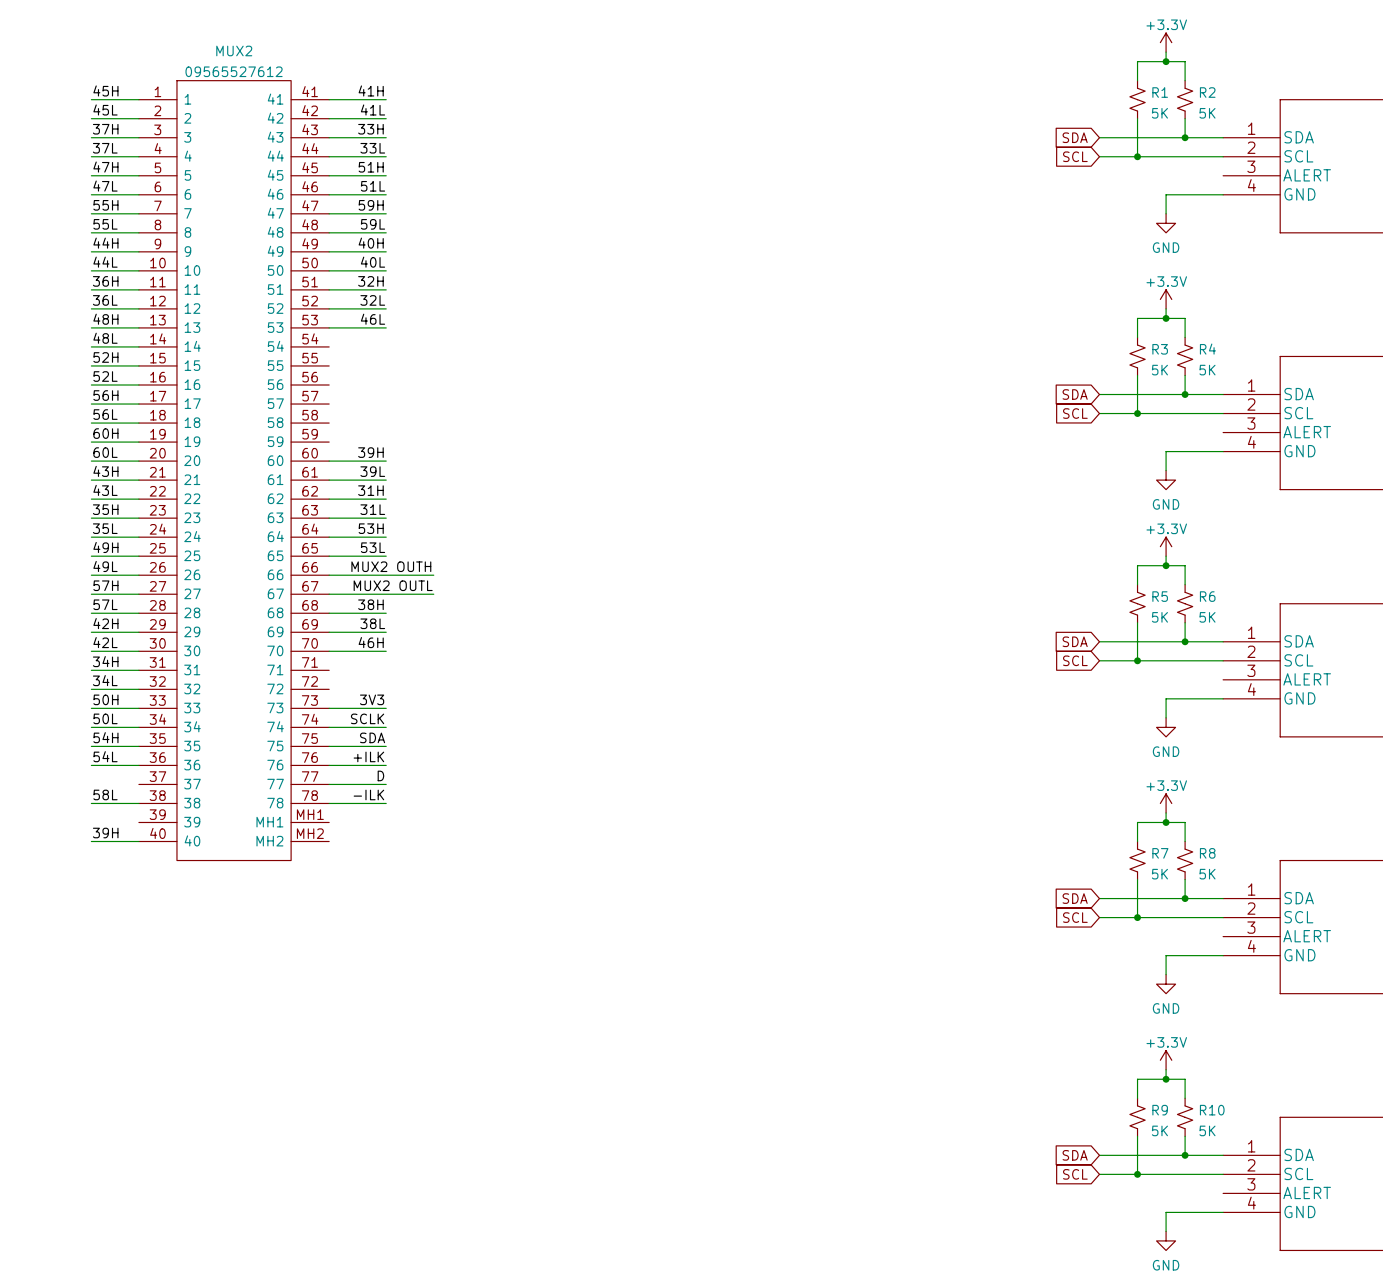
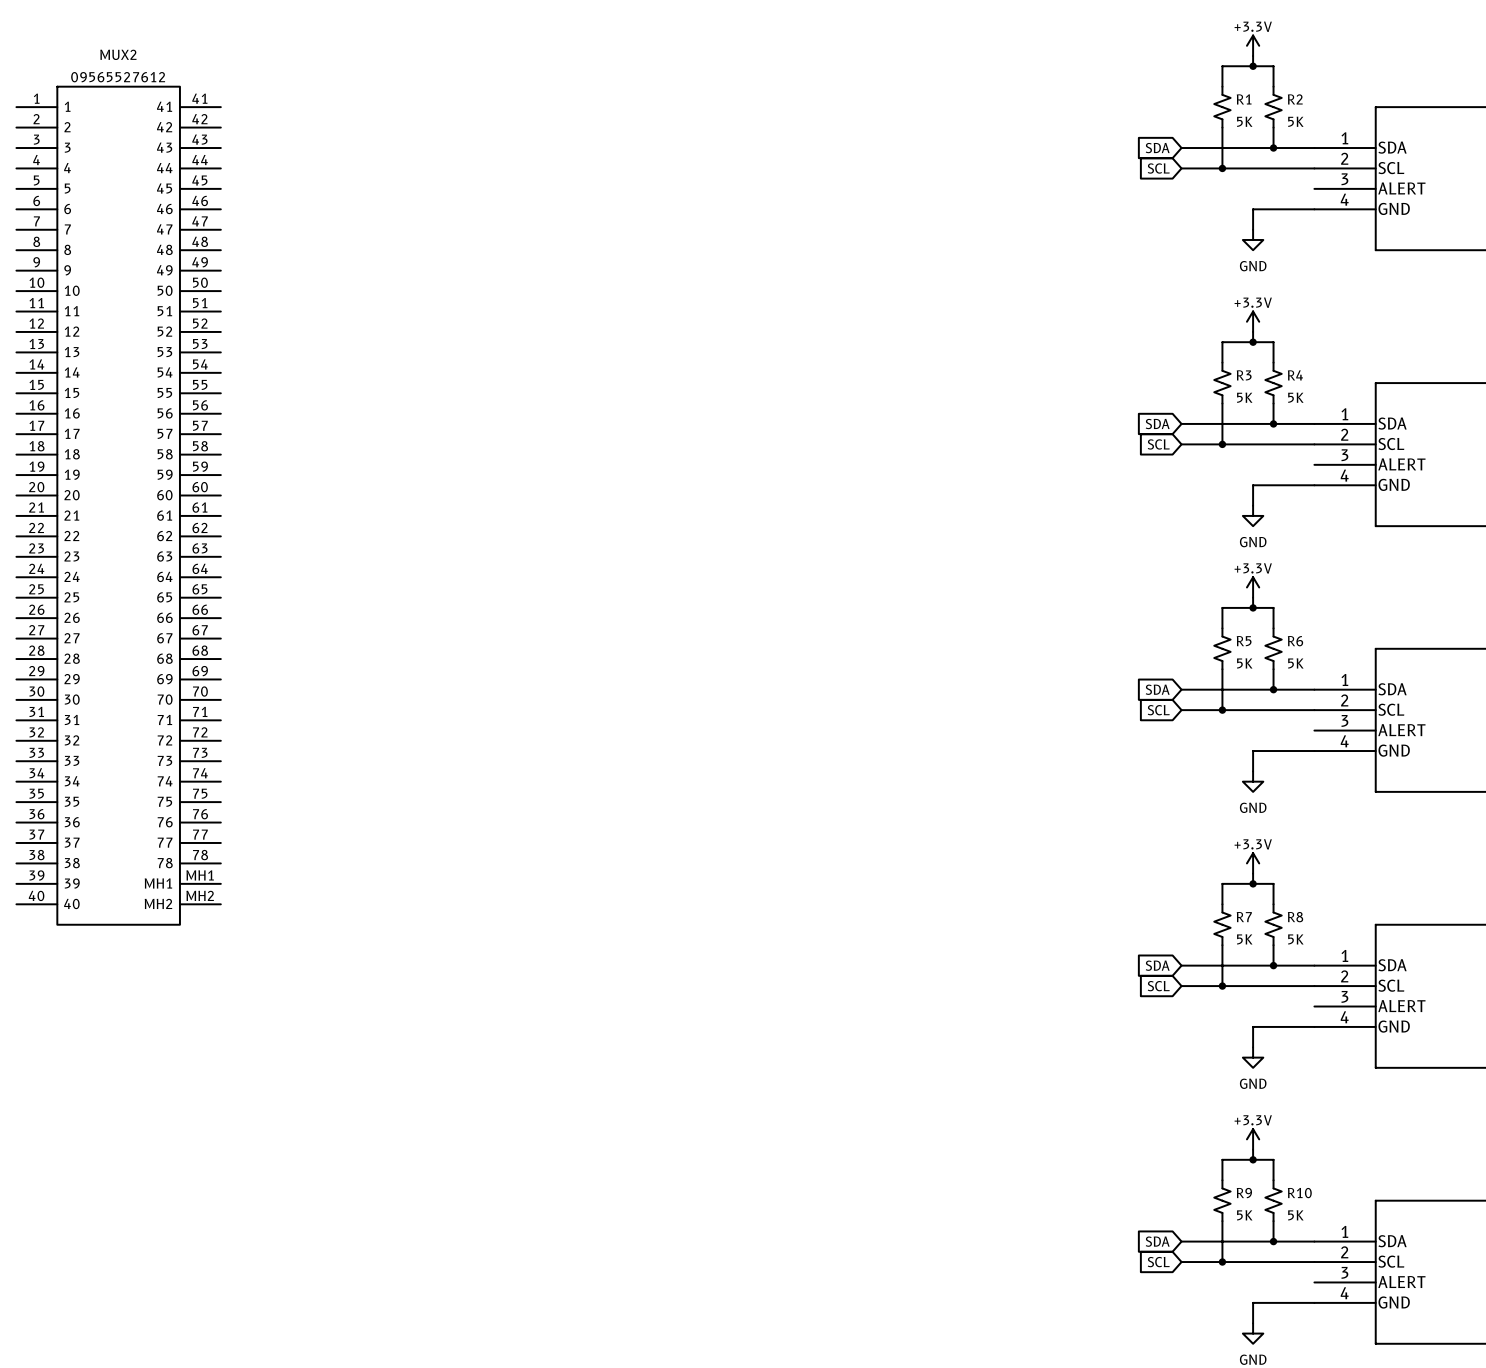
label: 45H (105, 90) -> none
label: 41H (371, 90) -> none
wire: (91, 99) (138, 99) -> none
wire: (329, 99) (386, 99) -> none
label: 45L (105, 109) -> none
label: 41L (373, 109) -> none
wire: (91, 118) (138, 118) -> none
wire: (329, 118) (386, 118) -> none
label: 37H (105, 129) -> none
label: 33H (370, 129) -> none
wire: (91, 137) (138, 137) -> none
wire: (329, 137) (386, 137) -> none
label: 37L (105, 148) -> none
label: 33L (372, 148) -> none
wire: (91, 156) (138, 156) -> none
wire: (329, 156) (386, 156) -> none
label: 47H (105, 167) -> none
label: 51H (371, 167) -> none
wire: (91, 175) (138, 175) -> none
wire: (329, 175) (386, 175) -> none
label: 47L (105, 186) -> none
label: 51L (373, 186) -> none
wire: (91, 194) (138, 194) -> none
wire: (329, 194) (386, 194) -> none
label: 55H (105, 205) -> none
label: 59H (371, 205) -> none
wire: (91, 213) (138, 213) -> none
wire: (329, 213) (386, 213) -> none
label: 55L (105, 224) -> none
label: 59L (373, 224) -> none
wire: (91, 232) (138, 232) -> none
wire: (329, 232) (386, 232) -> none
label: 44H (105, 243) -> none
label: 40H (371, 243) -> none
wire: (91, 251) (138, 251) -> none
wire: (329, 251) (386, 251) -> none
label: 44L (105, 262) -> none
label: 40L (373, 262) -> none
wire: (91, 270) (138, 270) -> none
wire: (329, 270) (386, 270) -> none
label: 36H (105, 281) -> none
label: 32H (370, 281) -> none
wire: (91, 289) (138, 289) -> none
wire: (329, 289) (386, 289) -> none
label: 36L (105, 300) -> none
label: 32L (372, 300) -> none
wire: (91, 308) (138, 308) -> none
wire: (329, 308) (386, 308) -> none
label: 48H (105, 319) -> none
label: 46L (373, 319) -> none
wire: (91, 327) (138, 327) -> none
wire: (329, 327) (386, 327) -> none
label: 48L (105, 338) -> none
wire: (91, 346) (138, 346) -> none
label: 52H (105, 357) -> none
wire: (91, 365) (138, 365) -> none
label: 52L (105, 376) -> none
wire: (91, 385) (138, 385) -> none
label: 56H (105, 395) -> none
wire: (91, 404) (138, 404) -> none
label: 56L (105, 414) -> none
wire: (91, 423) (138, 423) -> none
label: 60H (105, 433) -> none
wire: (91, 442) (138, 442) -> none
label: 60L (105, 452) -> none
label: 39H (370, 452) -> none
wire: (91, 461) (138, 461) -> none
wire: (329, 461) (386, 461) -> none
MUX2 position: (234, 470) -> (118, 505)
label: 43H (105, 471) -> none
label: 39L (372, 471) -> none
wire: (91, 480) (138, 480) -> none
wire: (329, 480) (386, 480) -> none
label: 43L (105, 490) -> none
label: 31H (370, 490) -> none
wire: (91, 499) (138, 499) -> none
wire: (329, 499) (386, 499) -> none
label: 35H (105, 509) -> none
label: 31L (372, 509) -> none
wire: (91, 518) (138, 518) -> none
wire: (329, 518) (386, 518) -> none
label: 35L (105, 528) -> none
label: 53H (371, 528) -> none
wire: (91, 537) (138, 537) -> none
wire: (329, 537) (386, 537) -> none
label: 49H (105, 547) -> none
label: 53L (373, 547) -> none
wire: (91, 556) (138, 556) -> none
wire: (329, 556) (386, 556) -> none
label: 49L (105, 566) -> none
label: MUX2 OUTH (391, 566) -> none
wire: (91, 575) (138, 575) -> none
wire: (329, 575) (433, 575) -> none
label: 57H (105, 585) -> none
label: MUX2 OUTL (393, 585) -> none
wire: (91, 594) (138, 594) -> none
wire: (329, 594) (433, 594) -> none
label: 57L (105, 604) -> none
label: 38H (370, 604) -> none
wire: (91, 613) (138, 613) -> none
wire: (329, 613) (386, 613) -> none
label: 42H (105, 623) -> none
label: 38L (372, 623) -> none
wire: (91, 632) (138, 632) -> none
wire: (329, 632) (386, 632) -> none
label: 42L (105, 642) -> none
label: 46H (371, 642) -> none
wire: (91, 651) (138, 651) -> none
wire: (329, 651) (386, 651) -> none
label: 34H (105, 661) -> none
wire: (91, 670) (138, 670) -> none
label: 34L (105, 680) -> none
wire: (91, 689) (138, 689) -> none
label: 50H (105, 699) -> none
label: 3V3 (372, 699) -> none
wire: (91, 708) (138, 708) -> none
wire: (329, 708) (386, 708) -> none
label: 50L (105, 718) -> none
label: SCLK (367, 718) -> none
wire: (91, 727) (138, 727) -> none
wire: (329, 727) (386, 727) -> none
label: 54H (105, 737) -> none
label: SDA (372, 737) -> none
wire: (91, 746) (138, 746) -> none
wire: (329, 746) (386, 746) -> none
label: 54L (105, 756) -> none
label: +ILK (368, 756) -> none
wire: (91, 765) (138, 765) -> none
wire: (329, 765) (386, 765) -> none
label: D (380, 775) -> none
wire: (329, 784) (386, 784) -> none
label: 58L (105, 794) -> none
label: -ILK (368, 794) -> none
wire: (91, 803) (138, 803) -> none
wire: (329, 803) (386, 803) -> none
label: 39H (105, 833) -> none
wire: (91, 841) (138, 841) -> none

